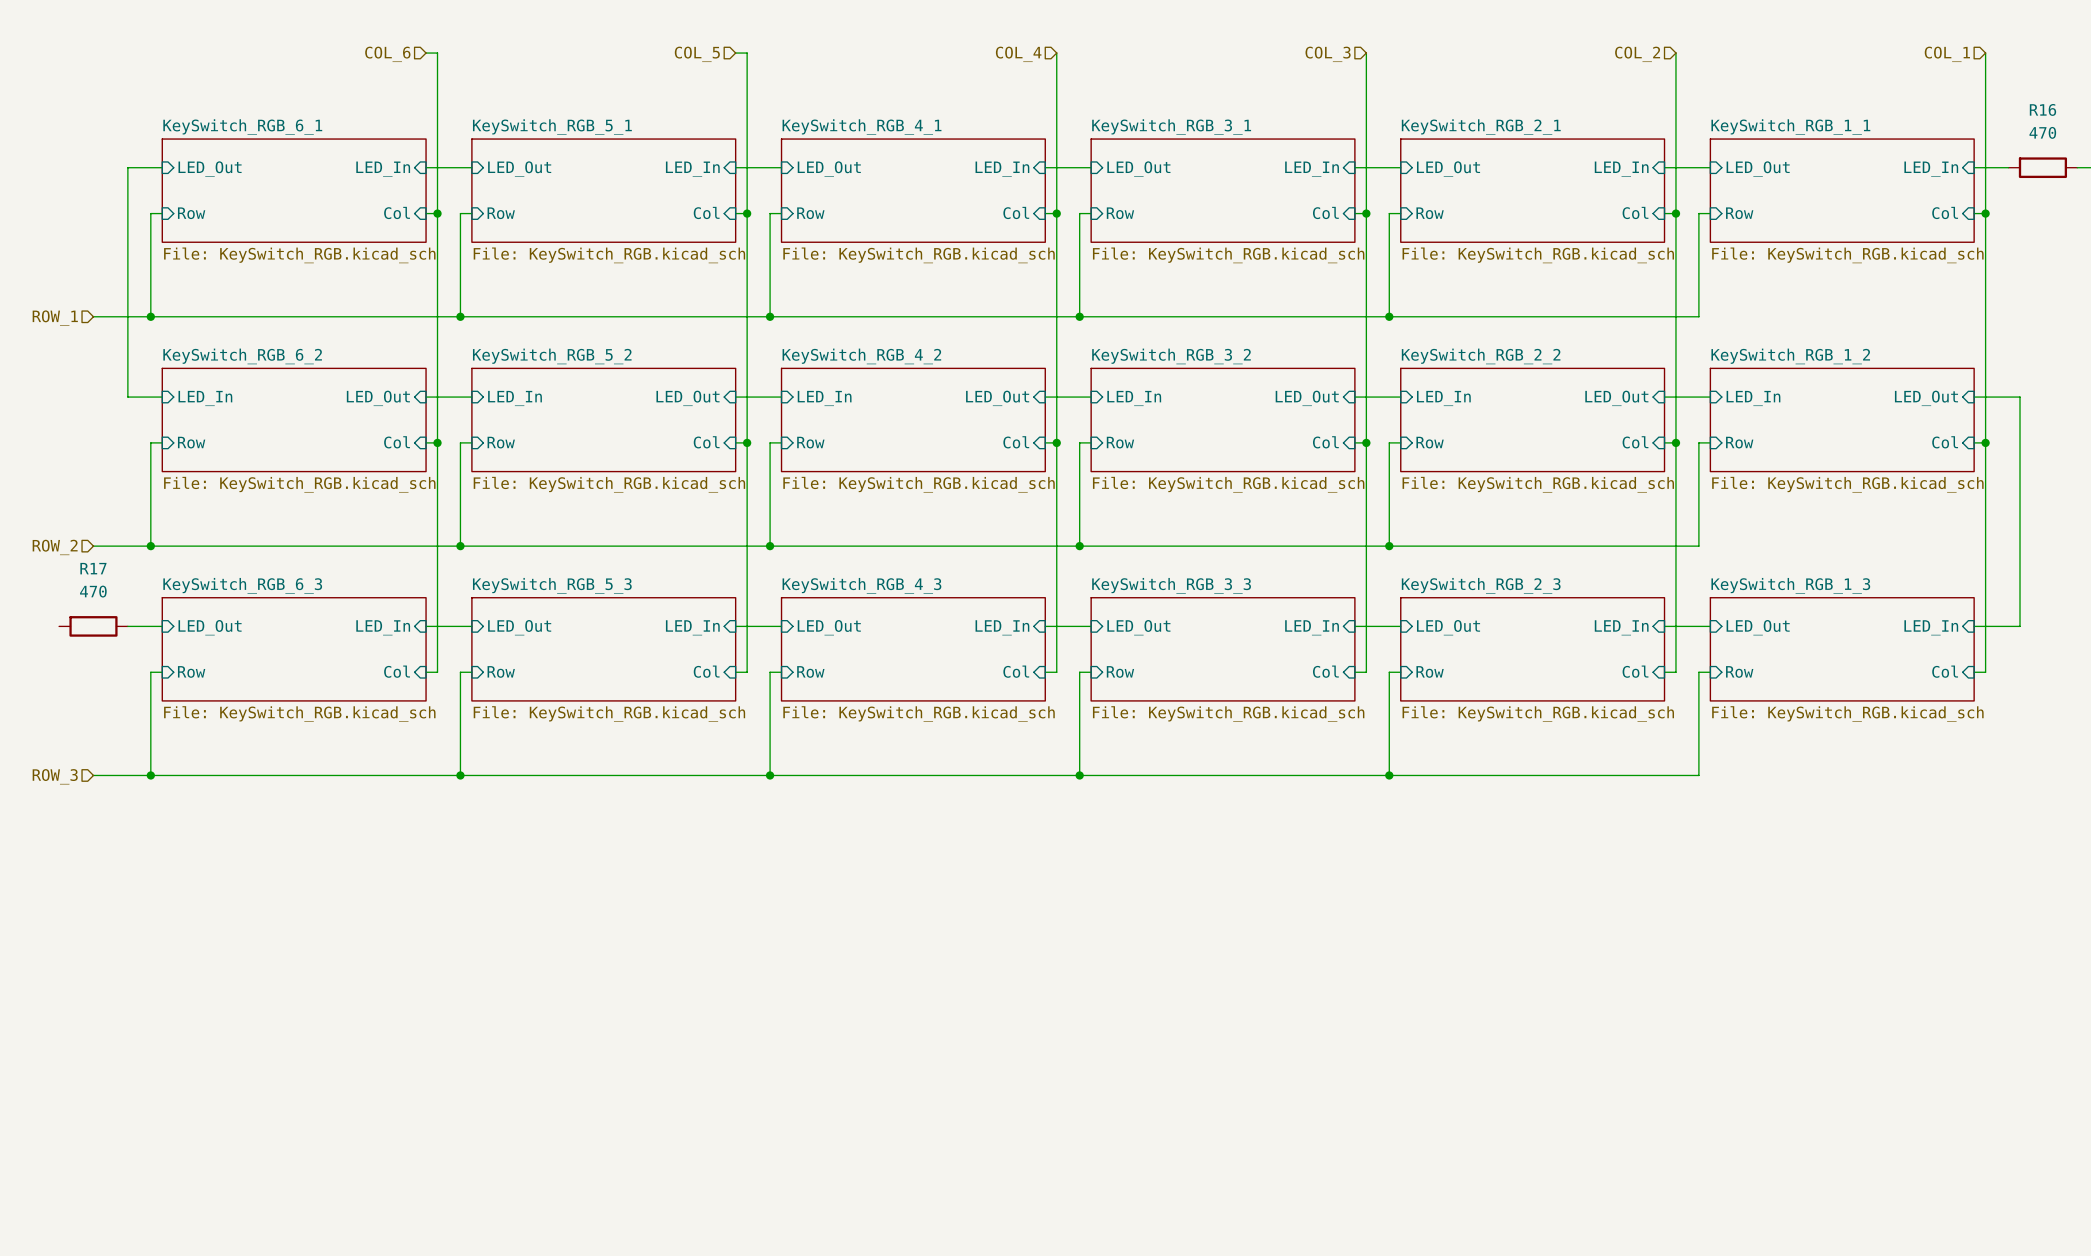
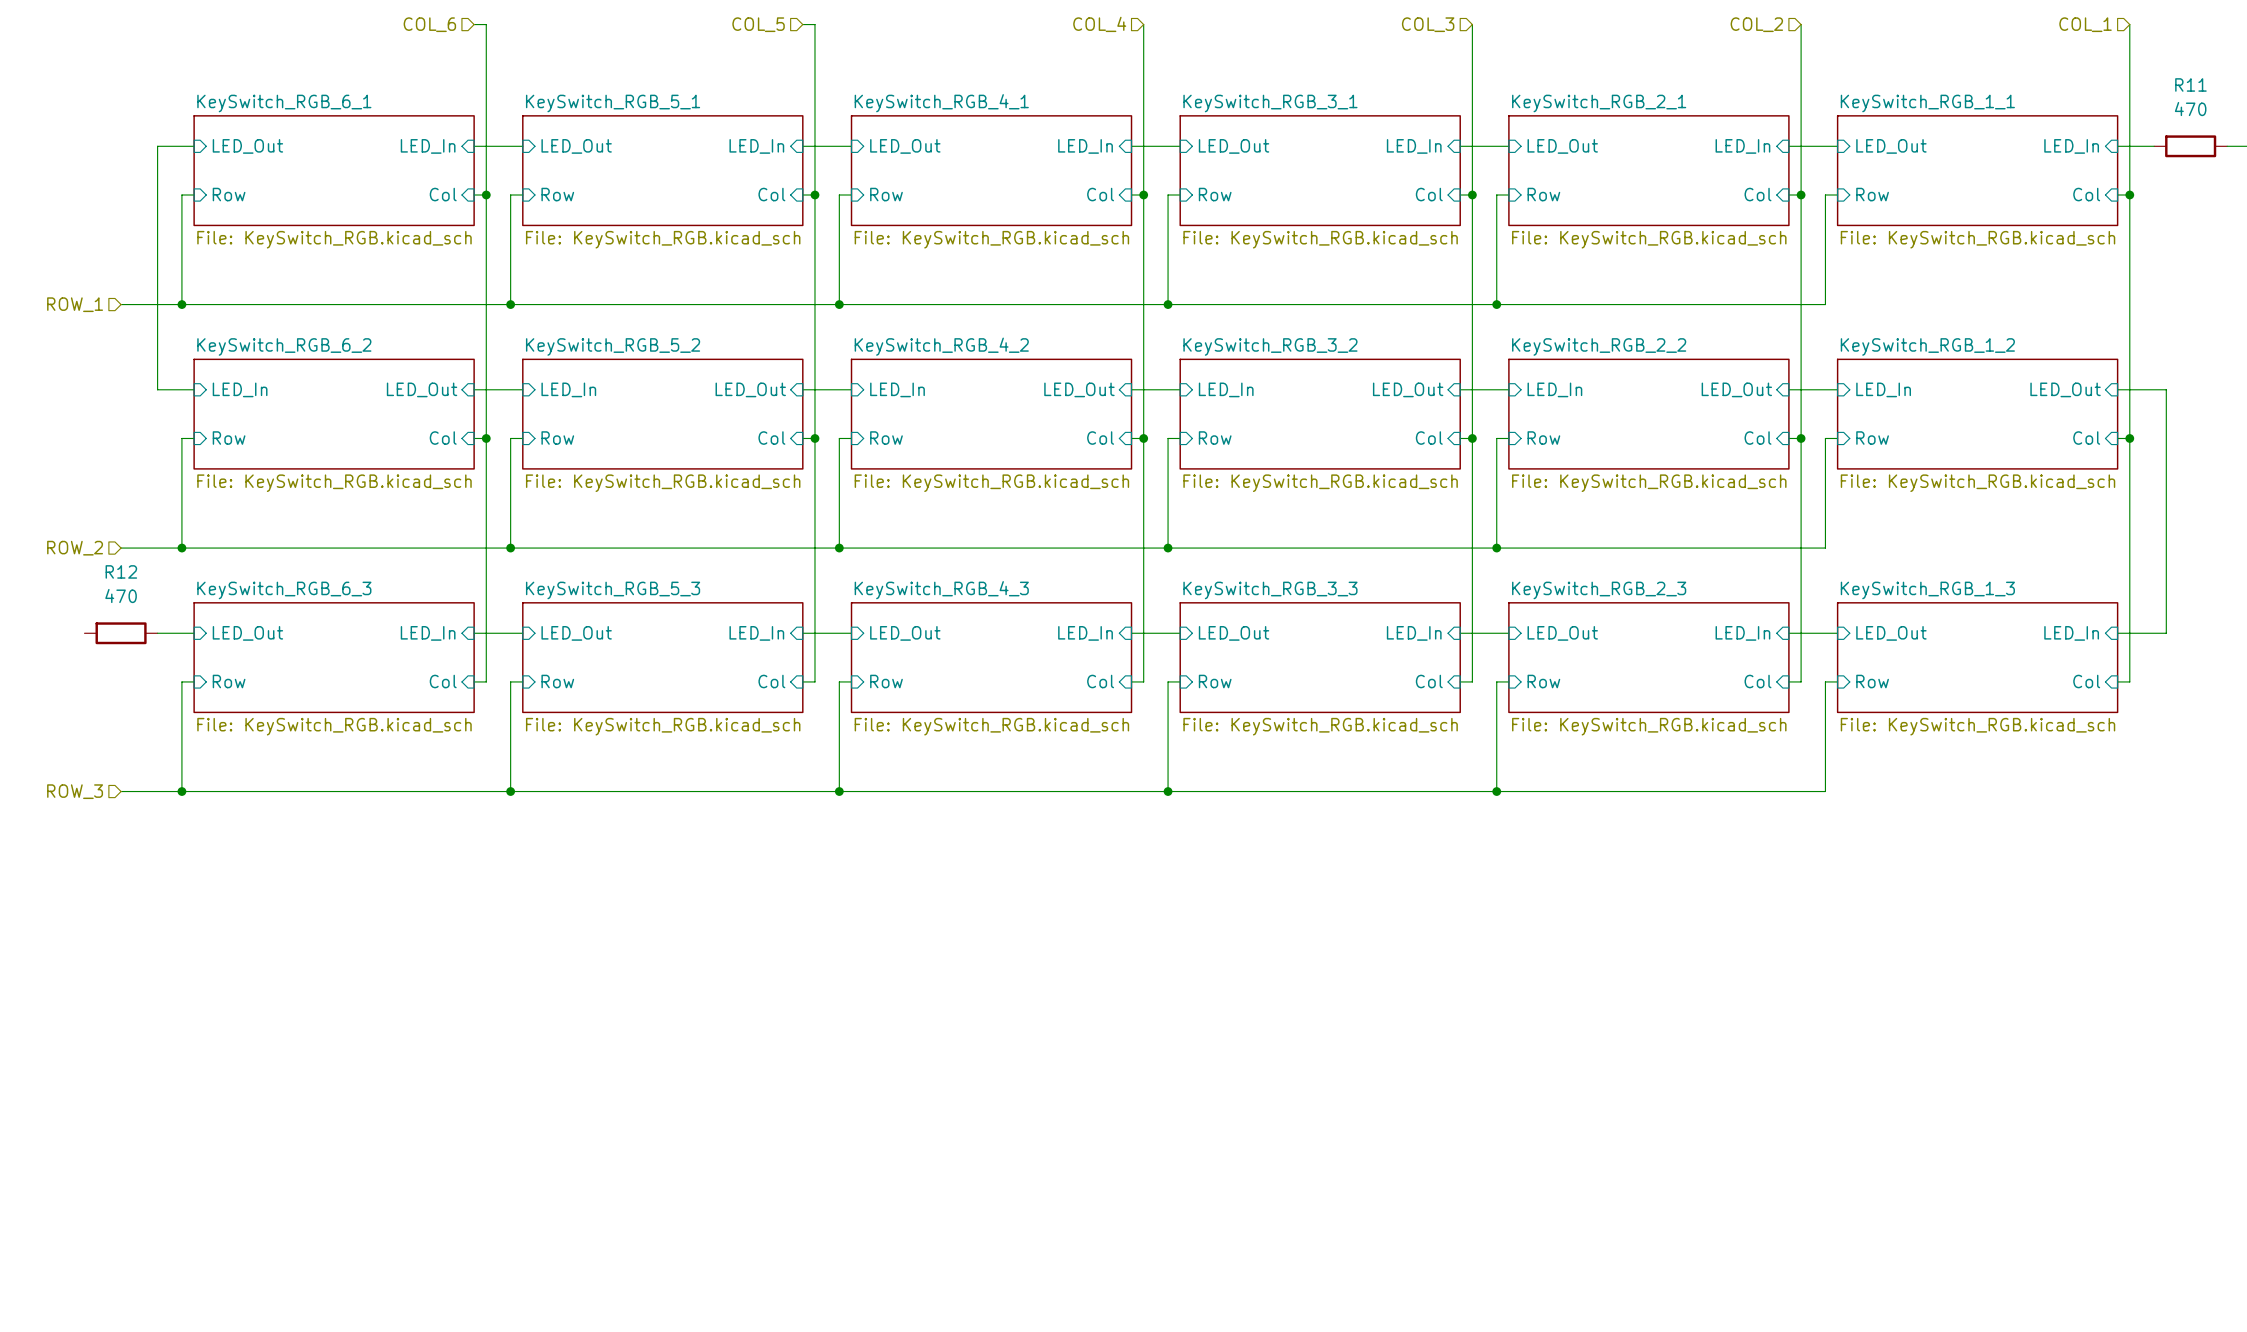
R16 name: R16 (2042, 109) -> R11 (2190, 84)
R17 name: R17 (93, 568) -> R12 (121, 571)

